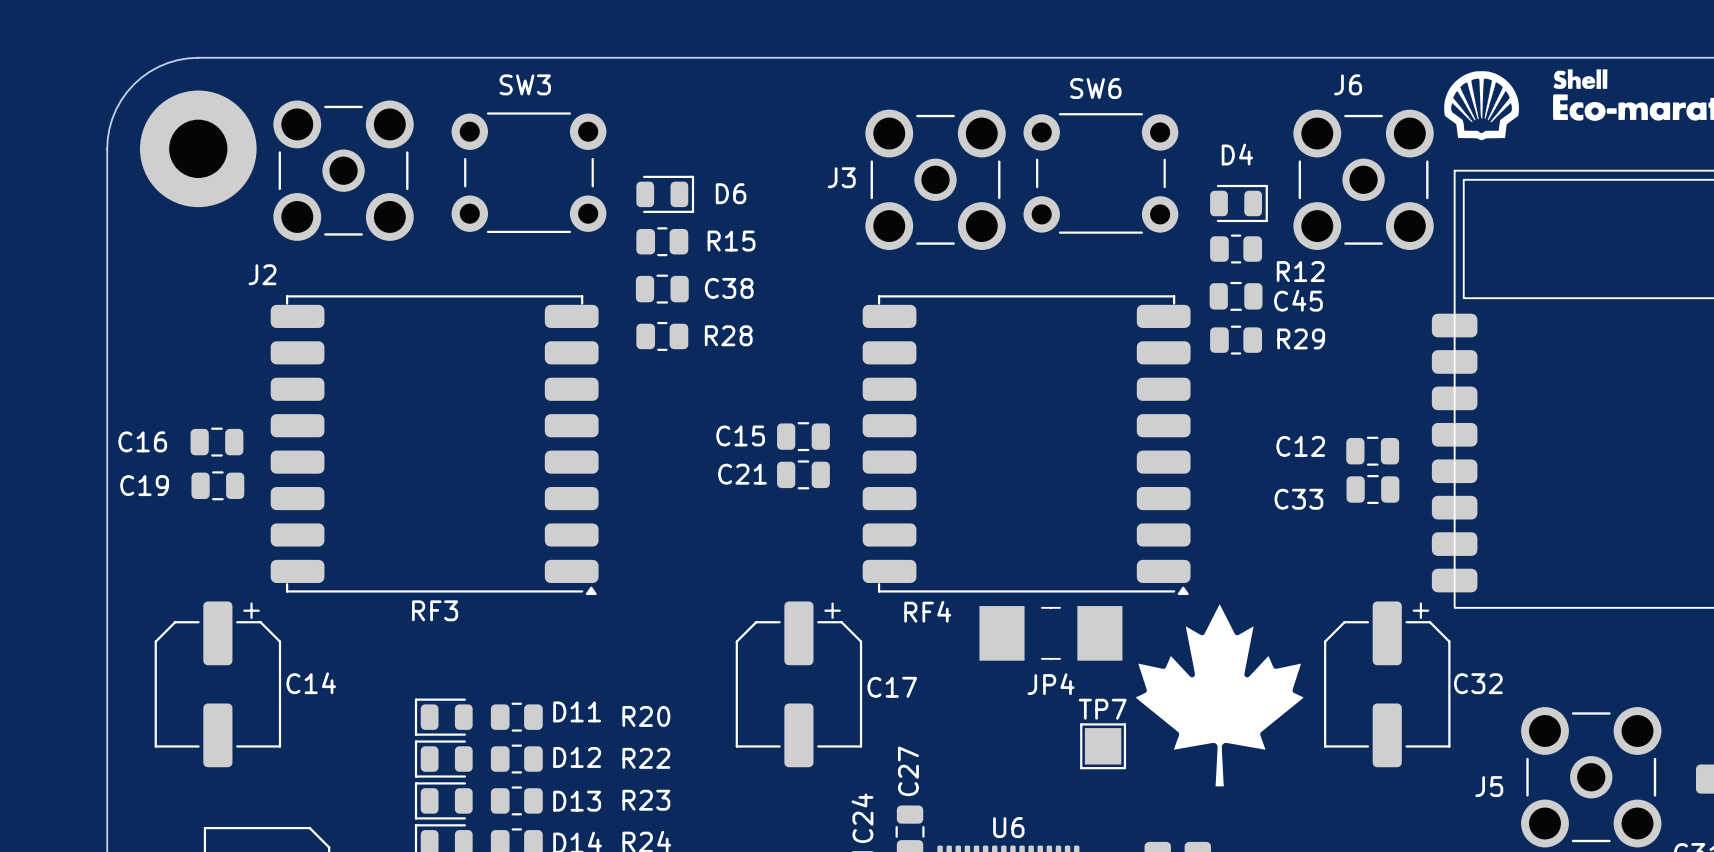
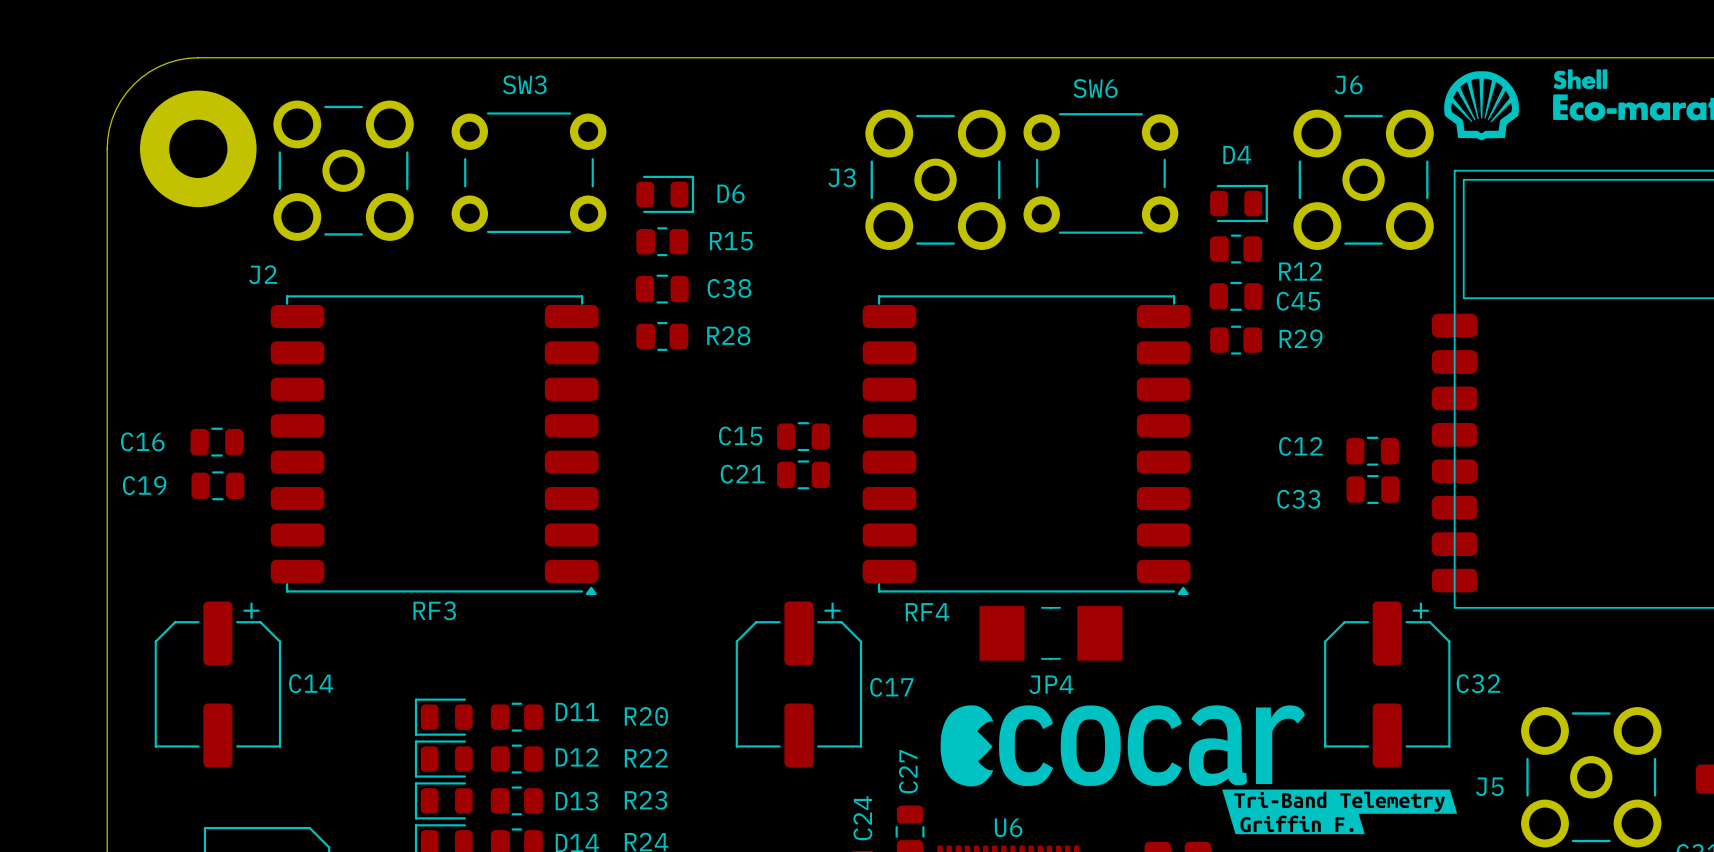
drawing: [1135, 604, 1304, 787] -> none
drawing: none -> [940, 705, 1458, 835]
TP7: (1103, 746) -> none

